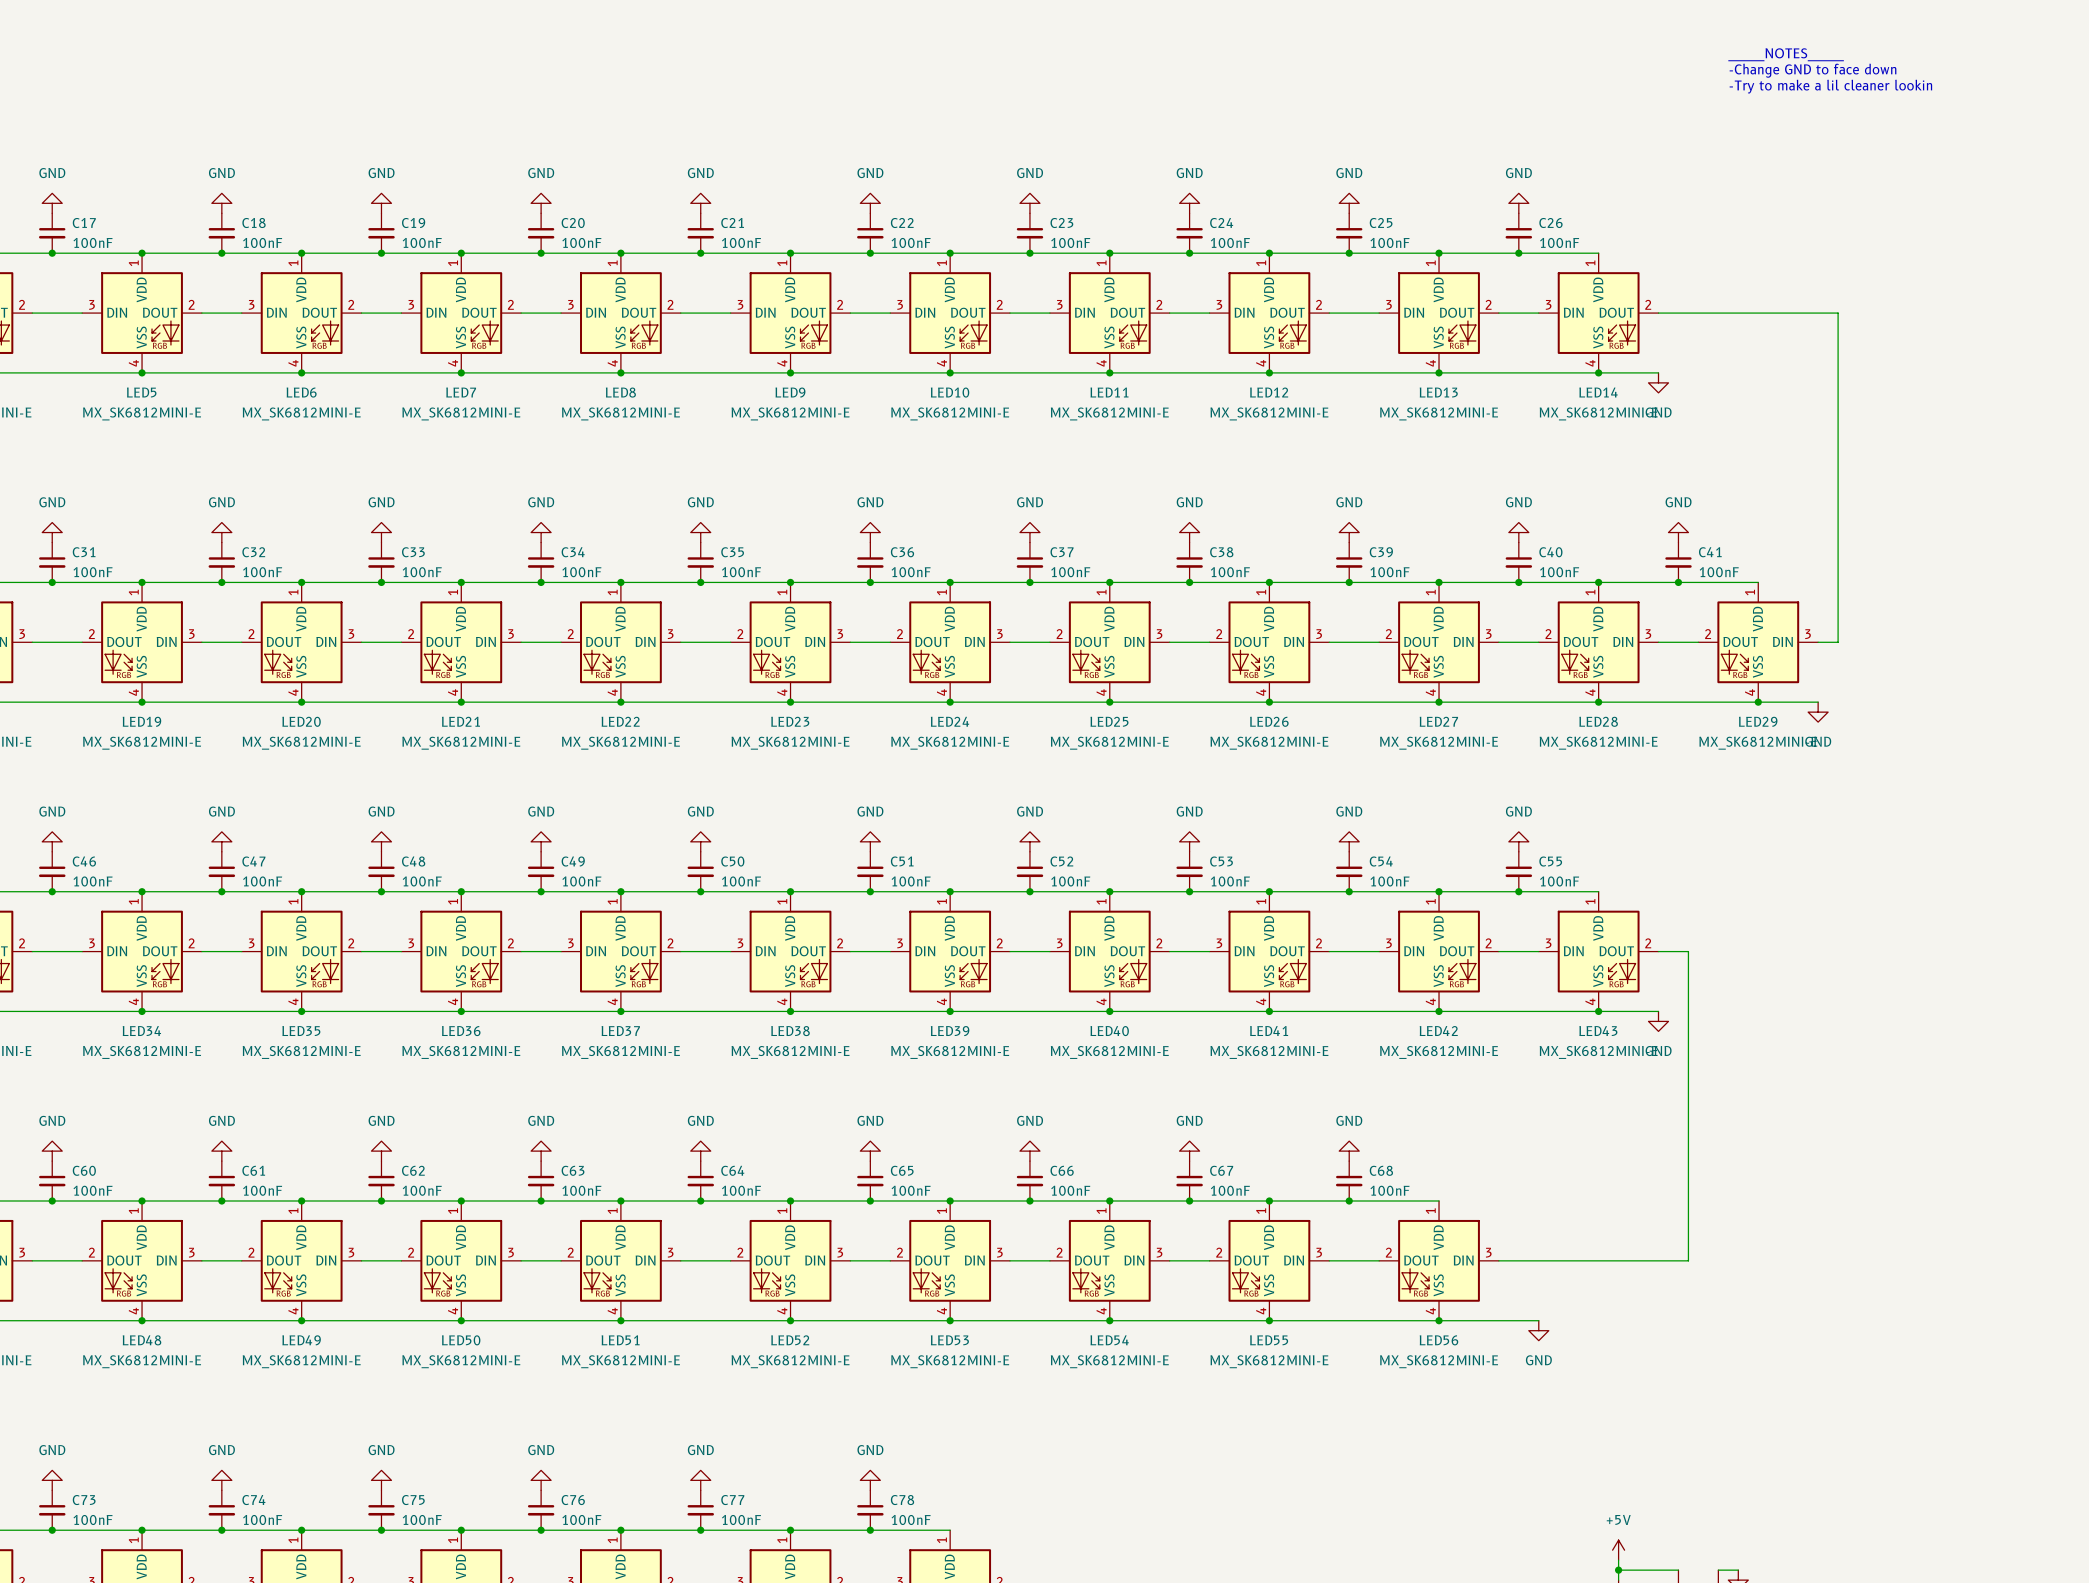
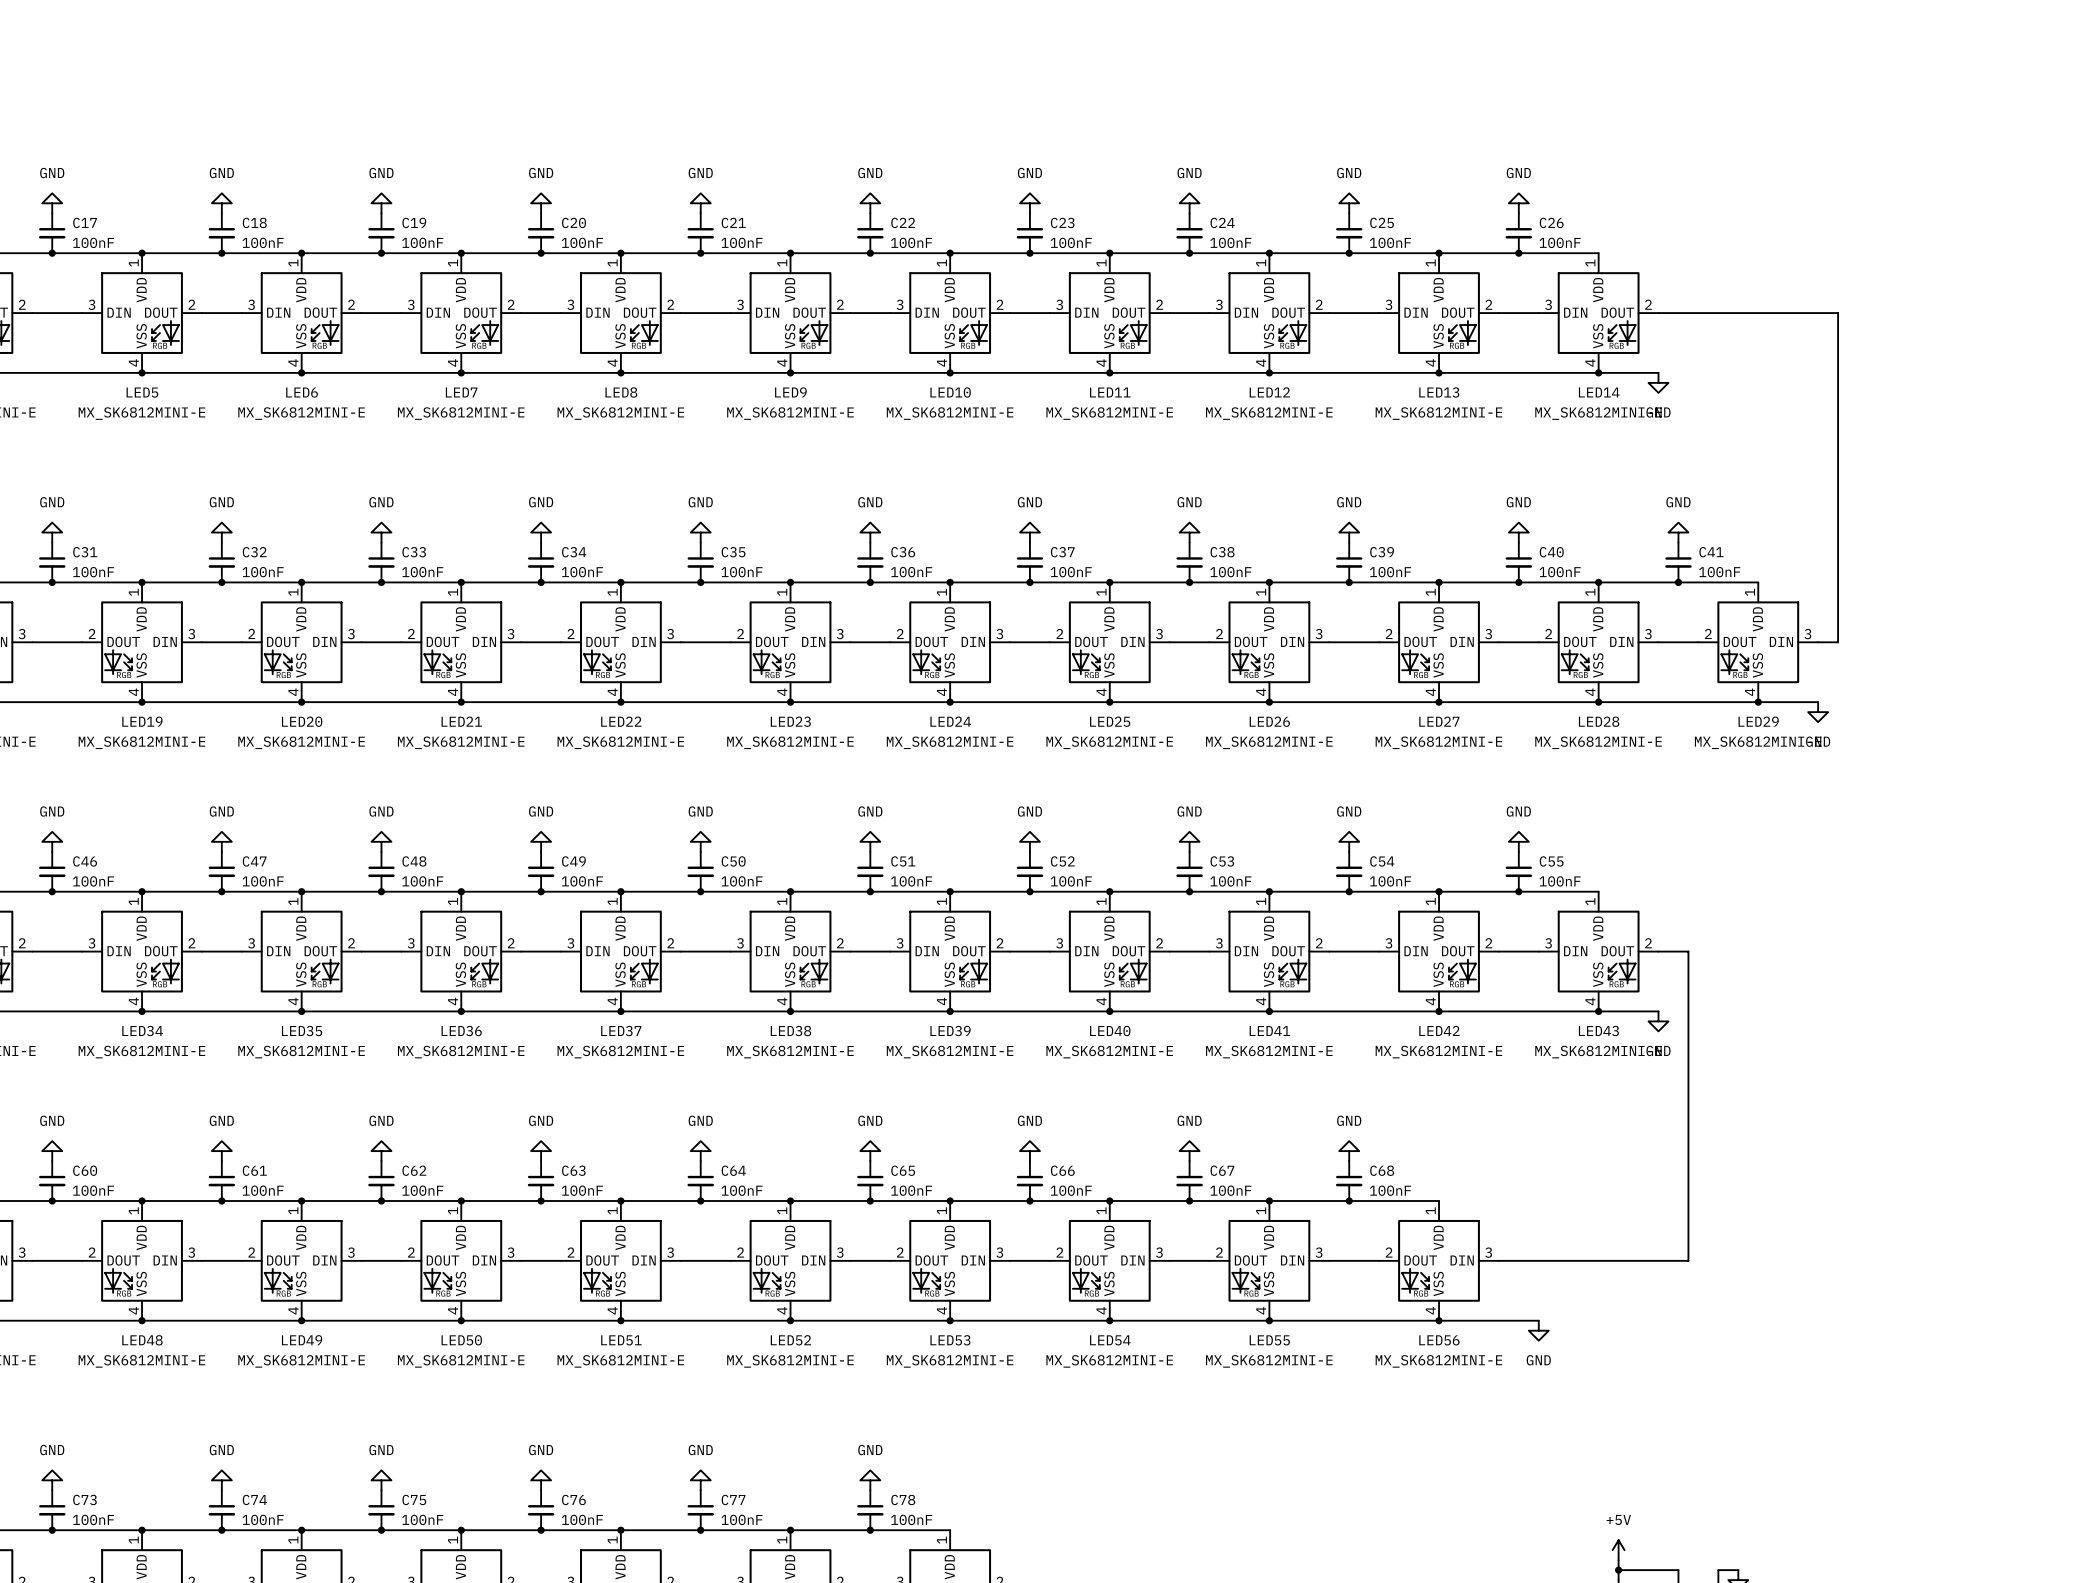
text: _____NOTES_____ (1786, 54) -> none
text: -Change GND to face down (1813, 70) -> none
text: -Try to make a lil cleaner lookin (1830, 86) -> none

